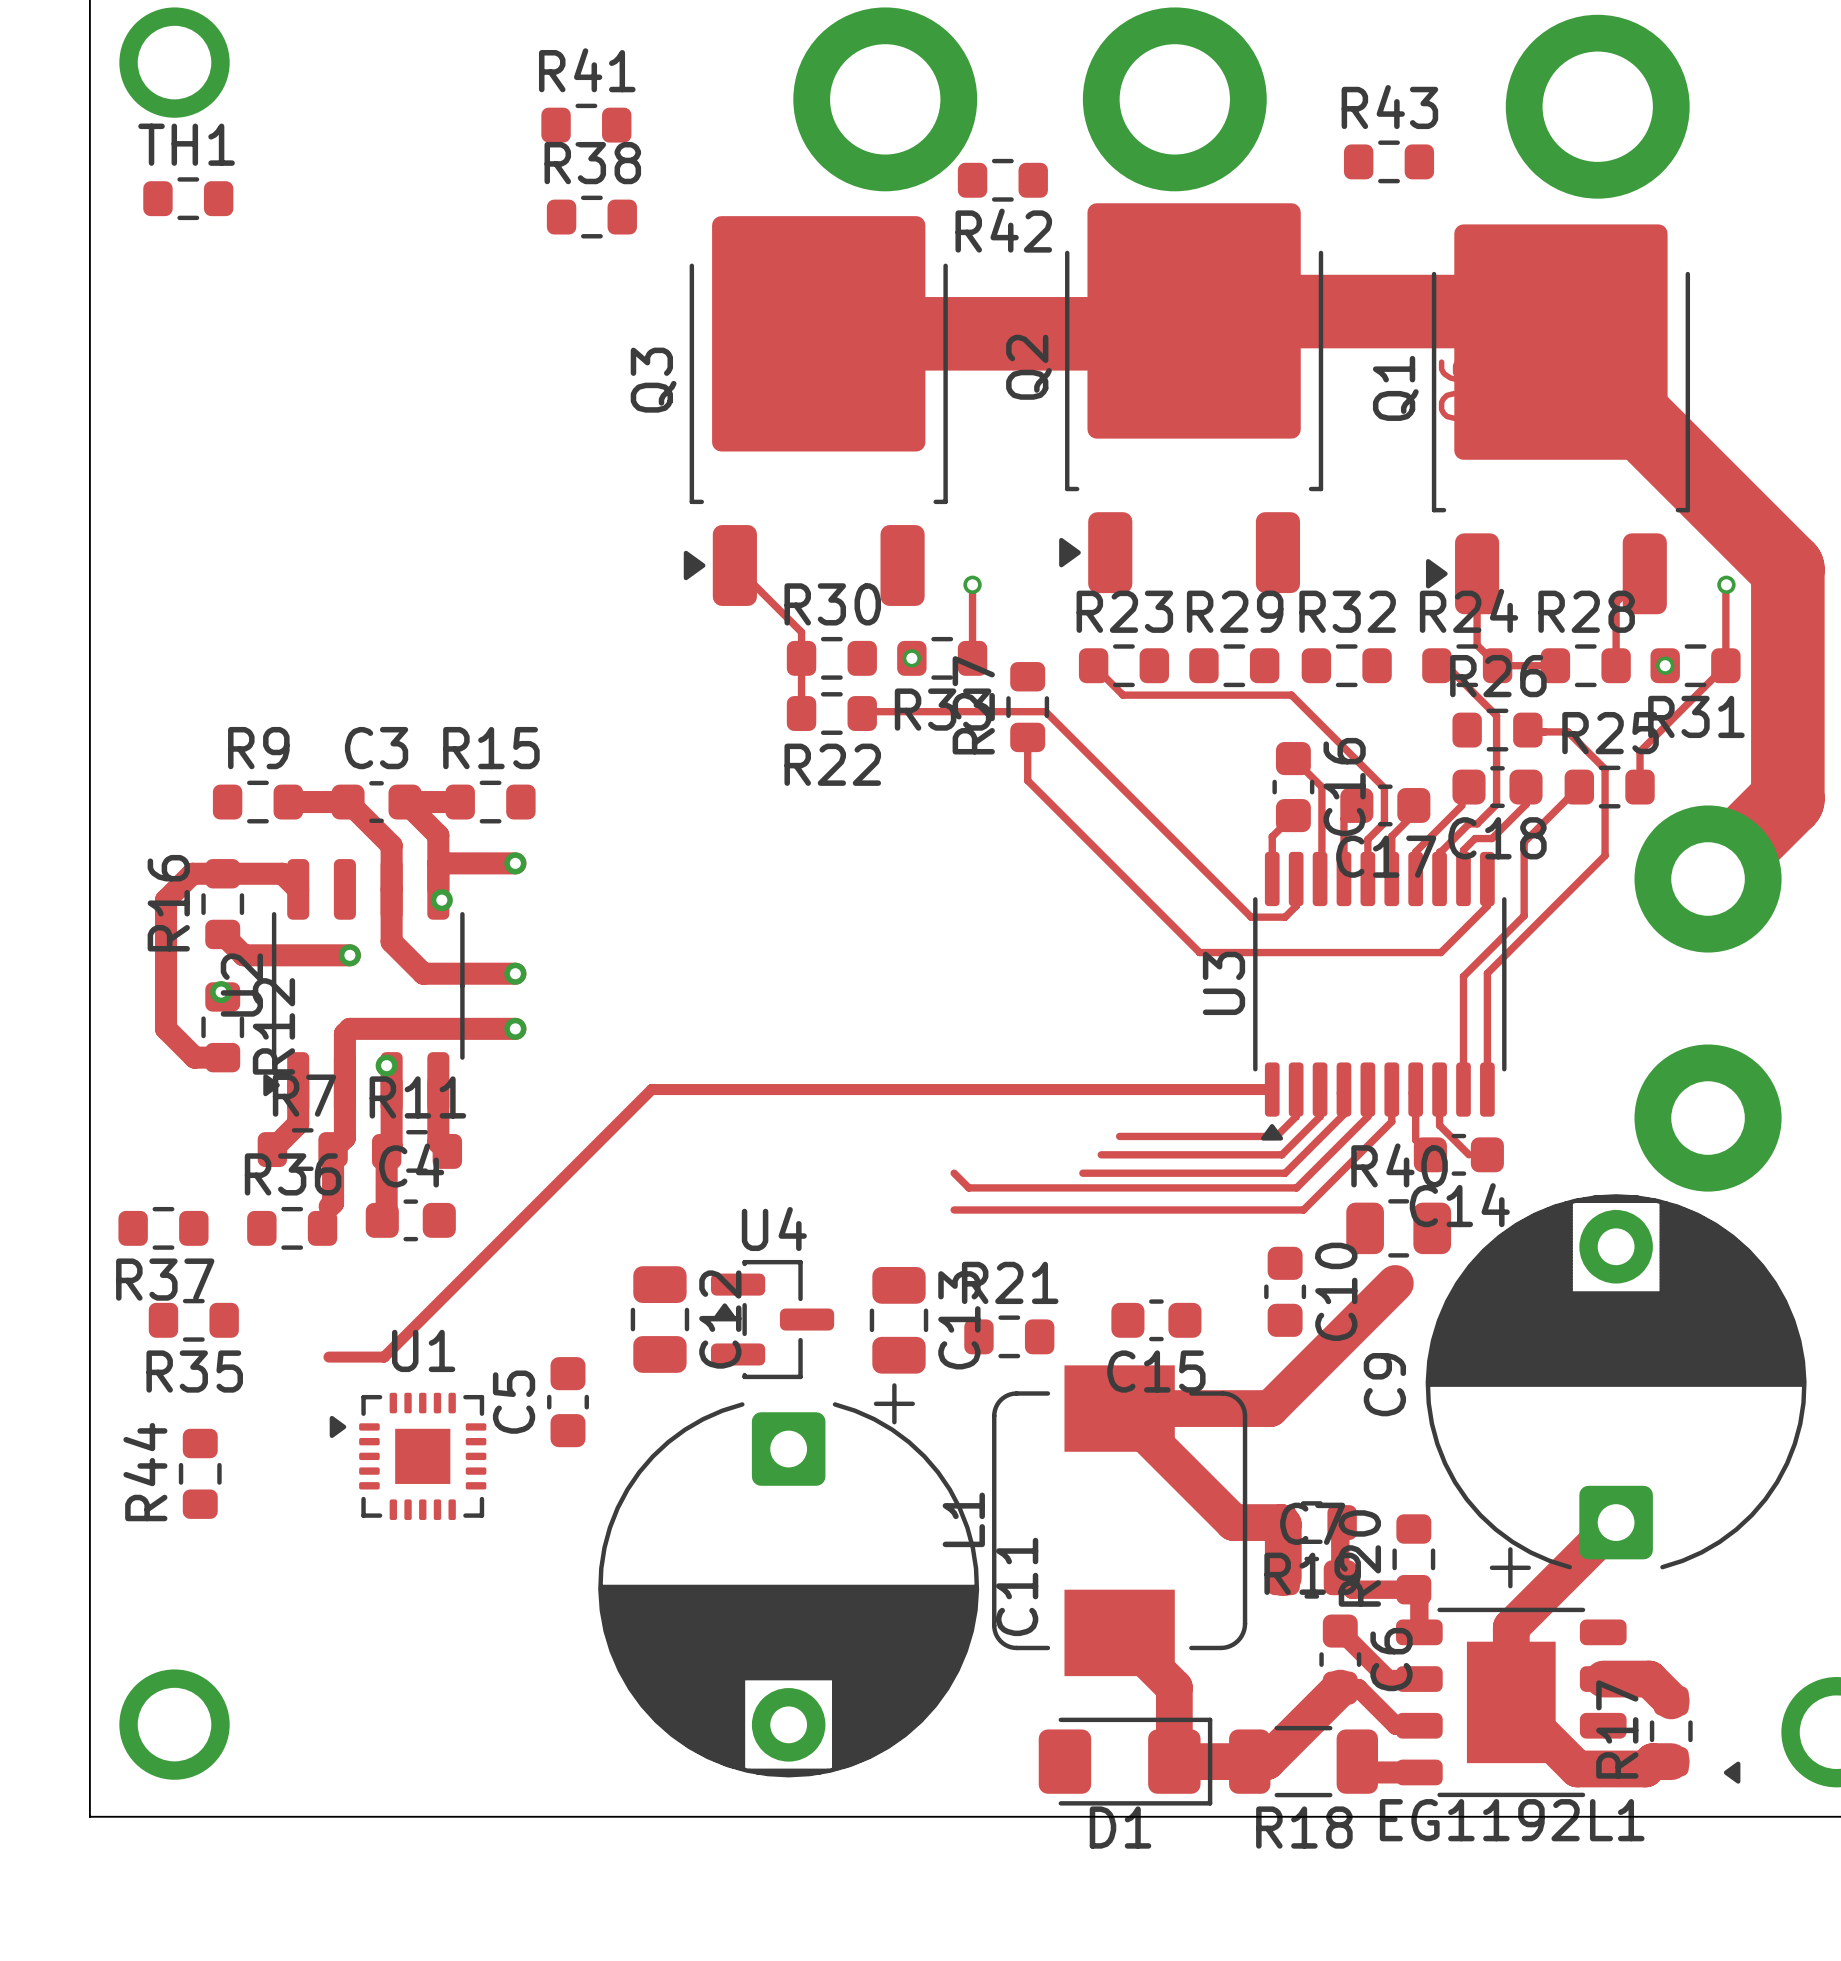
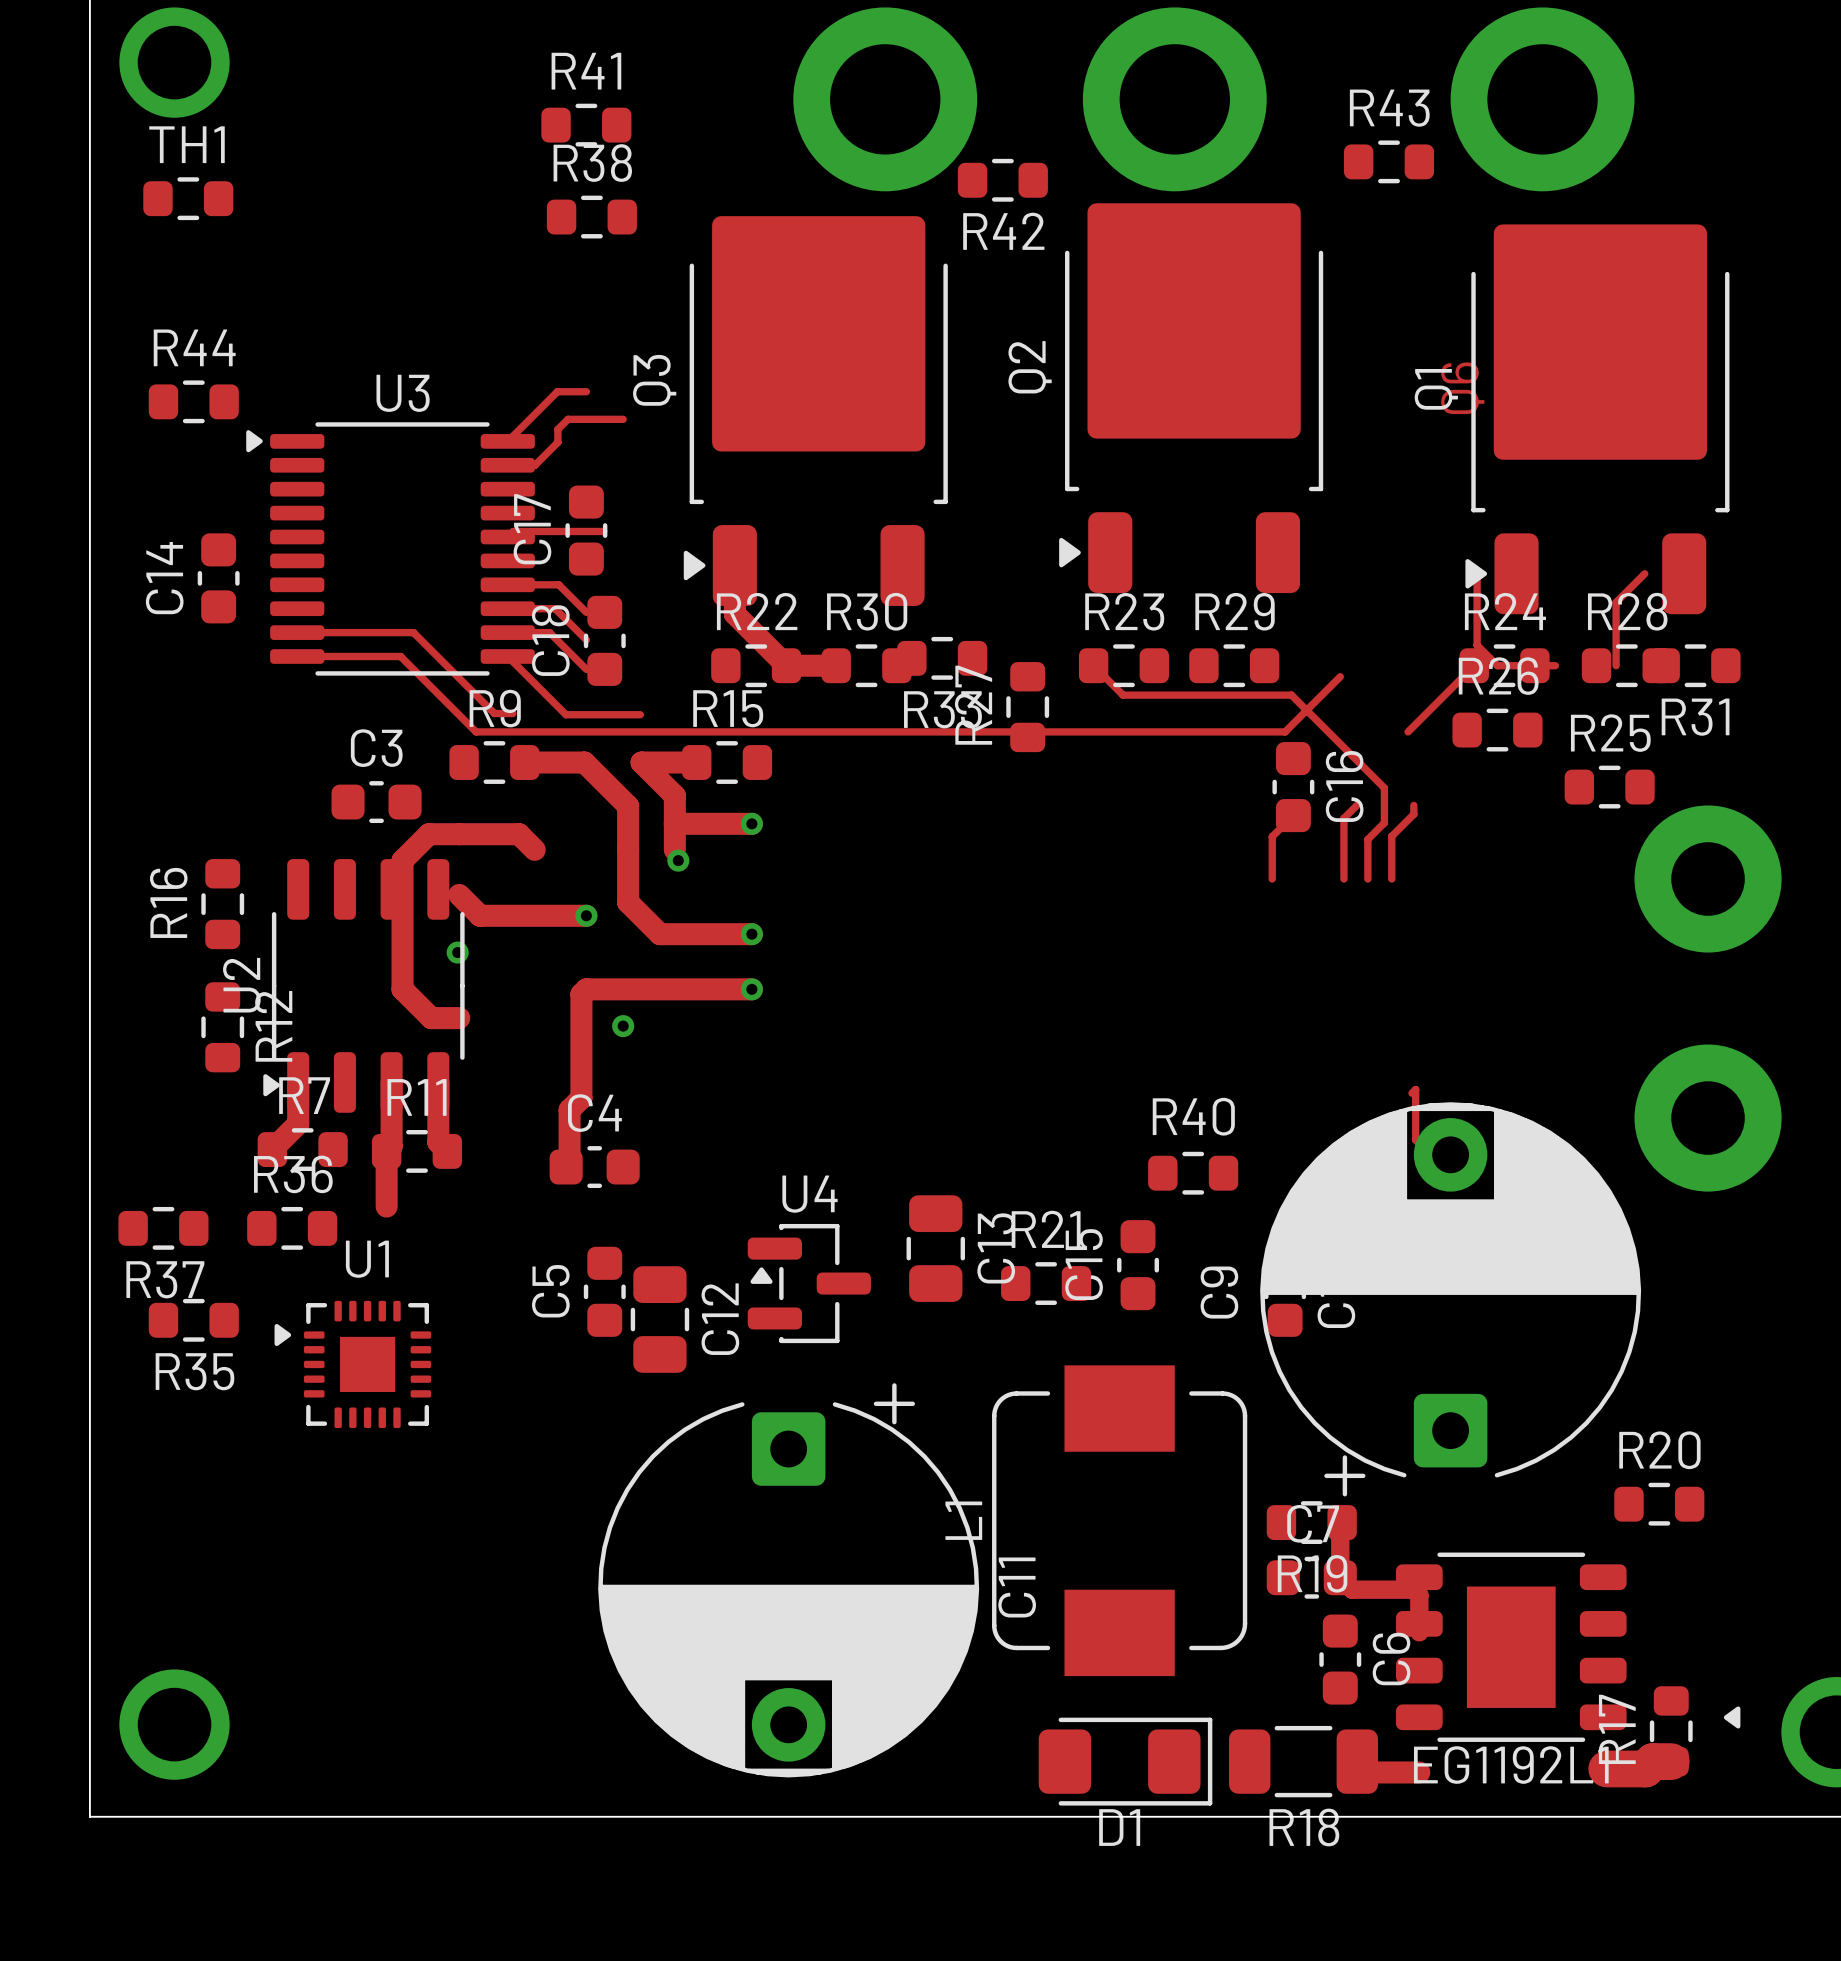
via position: (1597, 106) -> (1542, 99)
track: (818, 333) (1181, 333) (1203, 311) (1530, 311) (1787, 568) (1787, 799) (1708, 879) -> none
track: none -> (586, 391) (557, 391) (507, 441)
track: none -> (623, 419) (568, 419) (557, 429) (557, 442) (535, 465) (507, 465)
Q1 position: (1558, 419) -> (1597, 419)
track: none -> (603, 531) (513, 531) (507, 537)
track: (734, 565) (801, 632) (801, 713) -> (734, 565) (734, 614) (786, 665) (836, 665)
track: none -> (507, 584) (558, 584) (586, 612)
track: (972, 584) (972, 658) -> none
via: (972, 584) -> none
track: (1726, 584) (1725, 665) (1640, 751) (1640, 787) -> none
via: (1726, 584) -> none
track: none -> (507, 608) (555, 608) (586, 639)
track: none -> (297, 632) (413, 632) (494, 713) (512, 713)
track: none -> (507, 632) (549, 632) (586, 669)
track: none -> (297, 656) (400, 656) (476, 731) (1285, 731) (1340, 676)
track: none -> (507, 656) (566, 714) (640, 714)
R30 position: (831, 658) -> (866, 665)
via: (911, 658) -> none
track: (1433, 662) (1436, 665) (1446, 665) (1496, 715) (1496, 804) (1477, 823) (1469, 823) (1439, 853) -> none
R32: (1346, 665) -> none
R24 position: (1467, 665) -> (1504, 665)
track: none -> (1474, 665) (1408, 731)
R28 position: (1585, 665) -> (1626, 665)
via: (1665, 665) -> none
R22 position: (831, 713) -> (756, 665)
track: (862, 713) (864, 711) (1045, 711) (1251, 917) (1285, 917) (1296, 906) (1296, 879) -> none
track: (1524, 731) (1567, 731) (1605, 769) (1605, 855) (1487, 973) (1487, 1089) -> none
track: (1027, 737) (1027, 780) (1199, 952) (1440, 952) (1487, 906) (1487, 879) -> none
track: (1293, 758) (1321, 787) (1321, 877) (1320, 879) -> none
R22 name position: R22 (832, 764) -> R22 (757, 611)
C18 rotation: 0° (1497, 787) -> 90° clockwise (604, 640)
C18 position: (1497, 787) -> (604, 640)
track: (1526, 787) (1526, 804) (1491, 838) (1475, 838) (1463, 850) (1463, 879) -> none
track: (1579, 787) (1524, 842) (1524, 915) (1463, 976) (1463, 1089) -> none
R9 position: (257, 802) -> (494, 762)
track: (288, 802) (348, 802) (391, 845) (391, 941) (423, 973) (515, 973) -> (524, 762) (584, 762) (628, 806) (628, 902) (659, 934) (751, 934)
track: (460, 802) (405, 802) (438, 835) (438, 889) -> (696, 762) (641, 762) (674, 795) (674, 849)
R15 position: (490, 802) -> (727, 762)
C17 rotation: 0° (1385, 805) -> 90° clockwise (586, 530)
C17 position: (1385, 805) -> (586, 530)
track: (1462, 805) (1415, 851) (1415, 879) -> none
via: none -> (751, 823)
via: none -> (678, 860)
track: (438, 863) (515, 863) -> (674, 823) (751, 823)
via: (515, 863) -> none
track: (298, 889) (282, 873) (192, 873) (166, 900) (166, 1028) (194, 1057) (222, 1057) -> (534, 849) (519, 834) (428, 834) (402, 860) (402, 989) (431, 1018) (459, 1018)
via: (441, 900) -> none
via: none -> (586, 915)
track: (222, 934) (243, 955) (349, 955) -> (459, 894) (480, 915) (586, 915)
via: none -> (751, 934)
via: none -> (457, 952)
via: (349, 955) -> none
via: (515, 973) -> none
via: none -> (751, 989)
via: (221, 992) -> none
U3 rotation: 0° (1379, 996) -> 90° clockwise (390, 548)
U3 position: (1379, 996) -> (390, 548)
via: none -> (623, 1026)
track: (515, 1028) (349, 1028) (344, 1033) (344, 1137) (333, 1149) (333, 1203) (329, 1206) -> (751, 989) (586, 989) (581, 994) (581, 1098) (569, 1110) (569, 1163) (566, 1167)
via: (515, 1028) -> none
via: (386, 1065) -> none
track: (1272, 1089) (651, 1089) (384, 1357) (328, 1357) -> none
track: (1296, 1089) (1296, 1116) (1276, 1136) (1119, 1136) -> none
track: (1320, 1089) (1320, 1116) (1281, 1154) (1101, 1154) -> none
track: (1367, 1089) (1367, 1116) (1296, 1187) (968, 1187) (954, 1173) -> none
track: (1391, 1089) (1391, 1121) (1303, 1209) (954, 1209) -> none
track: (1439, 1089) (1439, 1125) (1469, 1154) -> none
track: (1340, 1093) (1343, 1089) (1343, 1114) (1285, 1173) (1082, 1173) -> none
C14 rotation: 0° (1458, 1154) -> 90° clockwise (218, 578)
C14 position: (1458, 1154) -> (218, 578)
R40 footprint: [1346, 1199, 1452, 1258] -> [1148, 1151, 1239, 1195]
C4 position: (410, 1220) -> (594, 1167)
track: (1396, 1281) (1270, 1408) (1119, 1408) (1233, 1522) (1281, 1522) (1283, 1524) (1283, 1577) -> none
U4 position: (772, 1319) -> (809, 1283)
C13 position: (898, 1320) -> (935, 1248)
C15 rotation: 0° (1156, 1320) -> 90° clockwise (1138, 1265)
C15 position: (1156, 1320) -> (1138, 1265)
R21 position: (1009, 1336) -> (1046, 1283)
C9 position: (1616, 1391) -> (1450, 1299)
C5 position: (568, 1402) -> (604, 1291)
U1 position: (408, 1456) -> (352, 1364)
R44 rotation: 0° (200, 1473) -> 90° clockwise (193, 401)
R44 position: (200, 1473) -> (193, 401)
track: (1616, 1522) (1511, 1627) (1511, 1702) (1577, 1768) (1603, 1768) -> none
R20 rotation: 0° (1413, 1559) -> 90° clockwise (1659, 1504)
R20 position: (1413, 1559) -> (1659, 1504)
track: (1340, 1631) (1388, 1679) (1419, 1679) -> none
track: (1119, 1632) (1174, 1687) (1174, 1761) (1266, 1761) (1340, 1688) -> none
track: (1603, 1679) (1649, 1679) (1671, 1700) -> none
track: (1340, 1688) (1358, 1688) (1396, 1725) (1419, 1725) (1395, 1725) -> none
EG1192L1 position: (1568, 1702) -> (1568, 1647)

